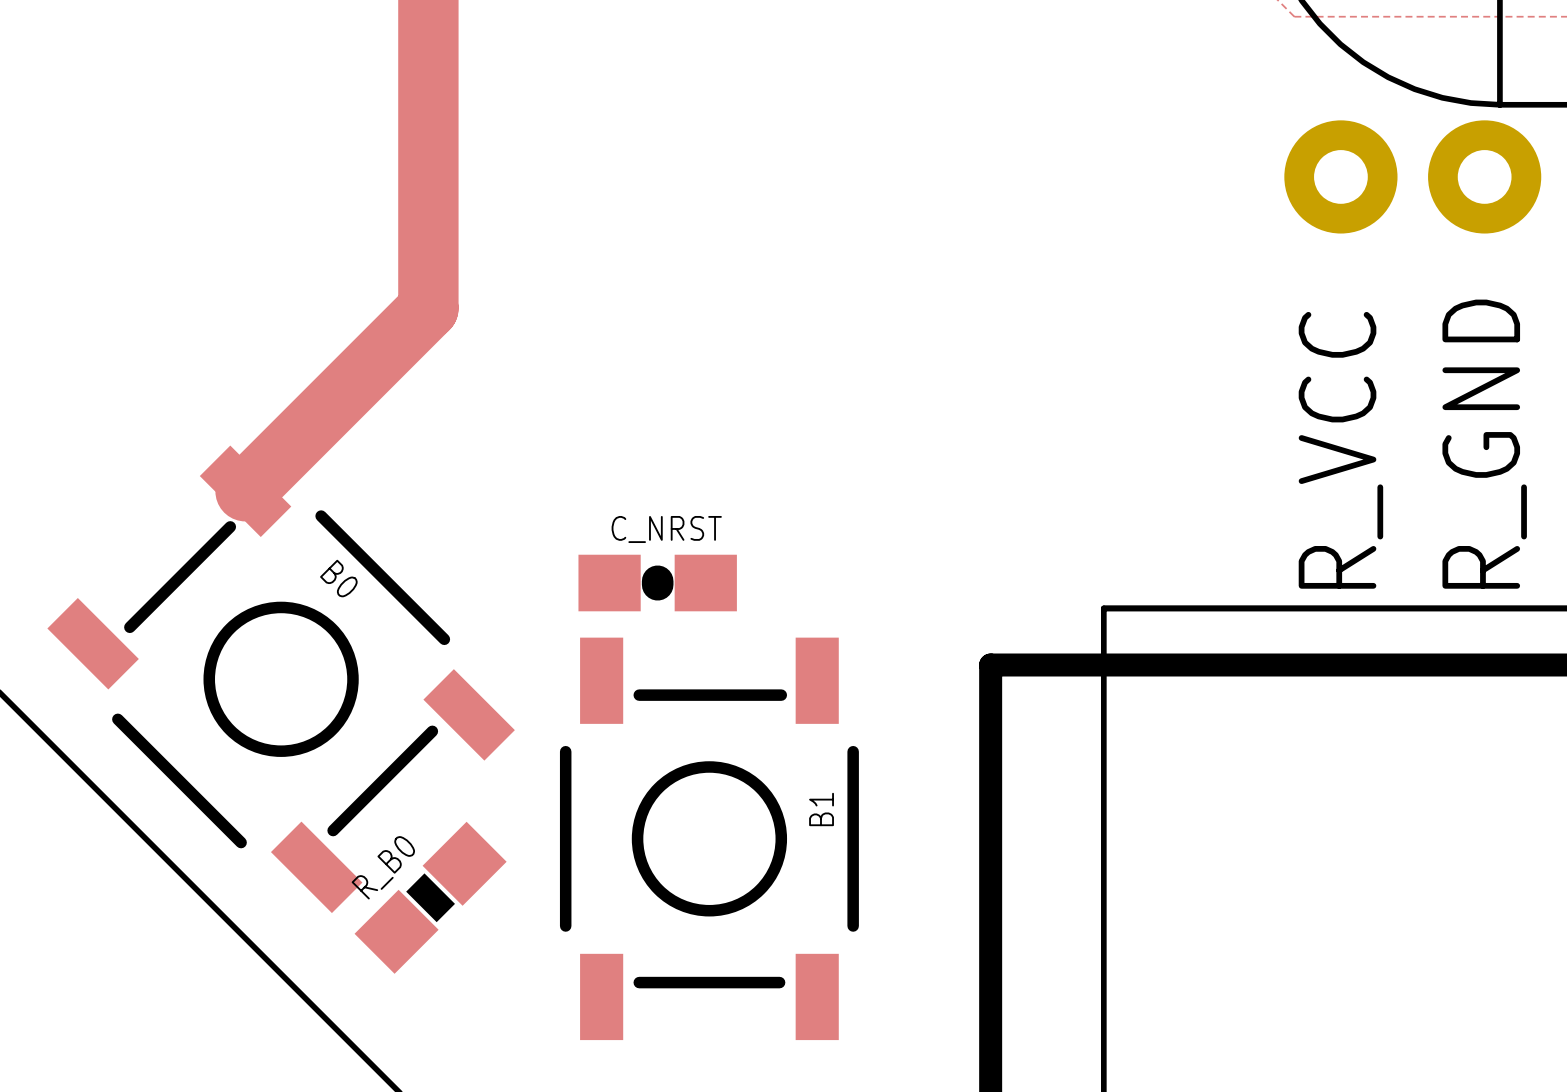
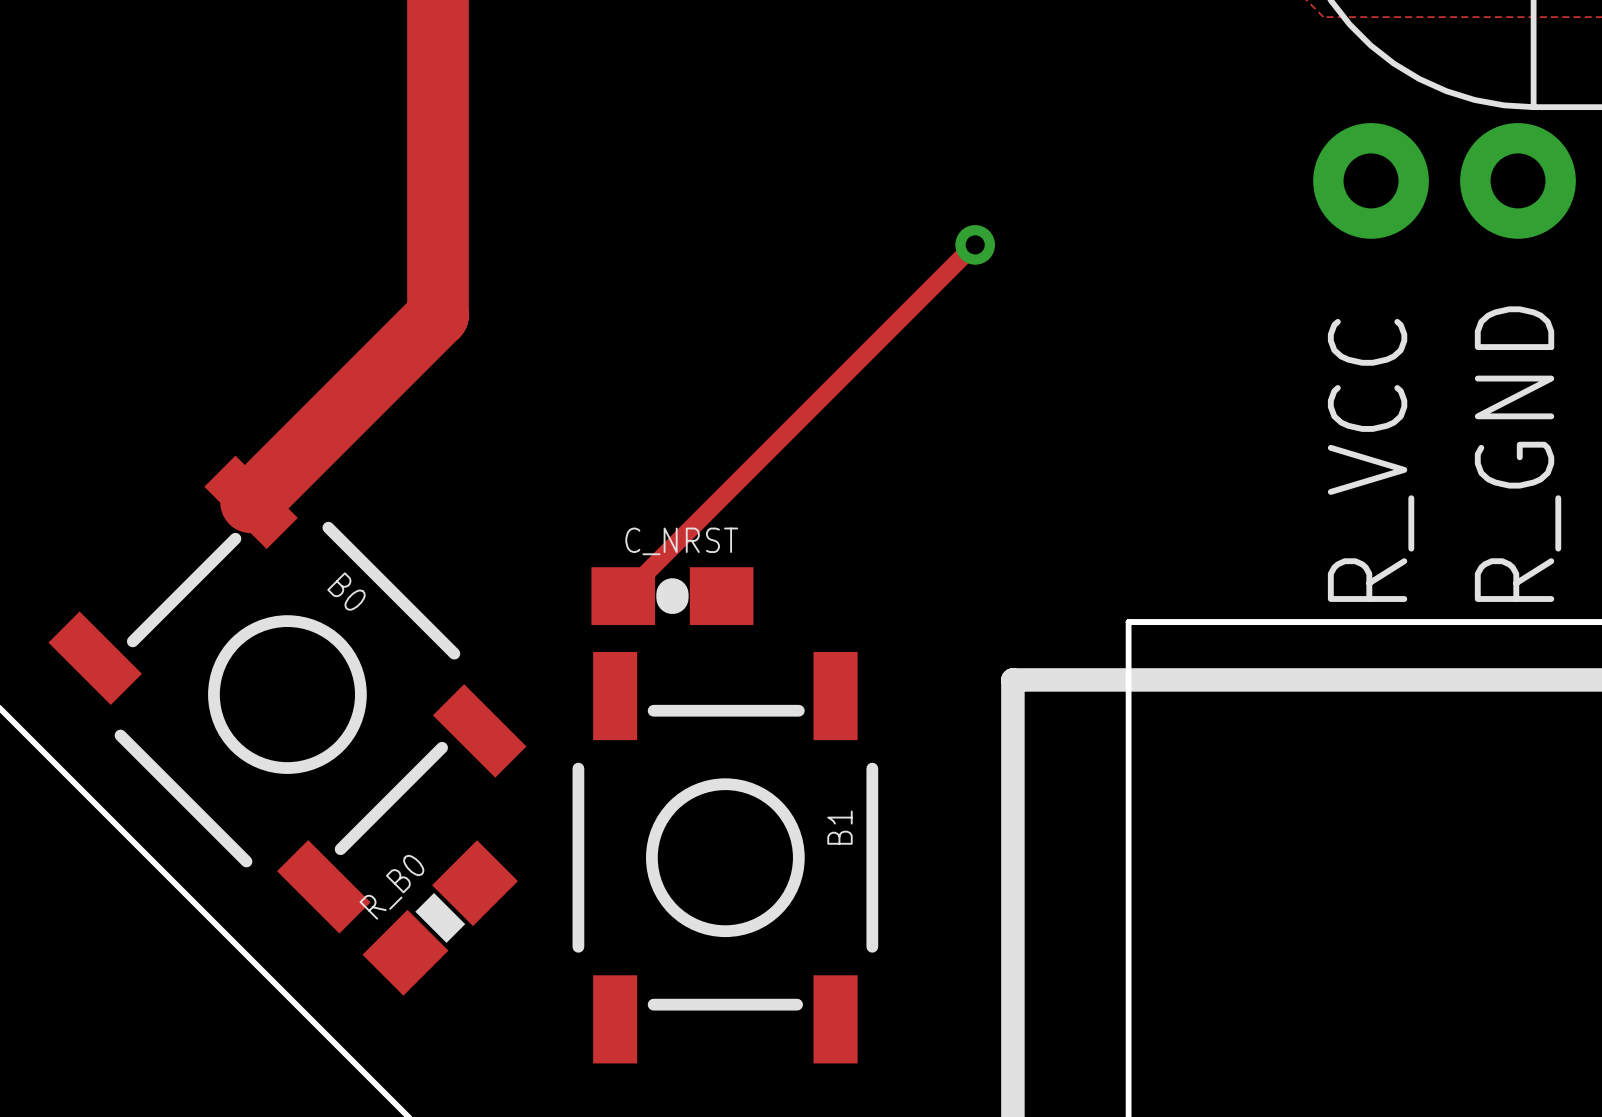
track: none -> (974, 244) (623, 596)
via: none -> (975, 244)

